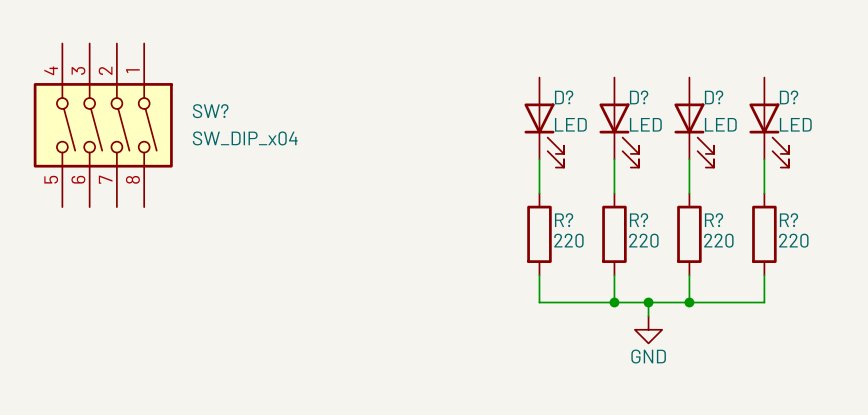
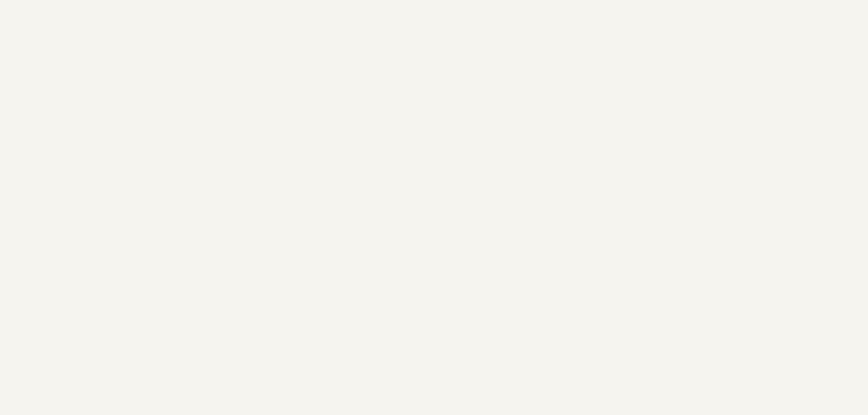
D?: LED (544, 122) -> none
D?: LED (619, 122) -> none
D?: LED (694, 122) -> none
D?: LED (769, 122) -> none
SW?: SW_DIP_x04 (103, 125) -> none
wire: (539, 159) (539, 193) -> none
wire: (614, 159) (614, 193) -> none
wire: (689, 159) (689, 193) -> none
wire: (764, 159) (764, 193) -> none
R?: 220 (539, 234) -> none
R?: 220 (614, 234) -> none
R?: 220 (689, 234) -> none
R?: 220 (764, 234) -> none
wire: (539, 275) (539, 302) (764, 302) (764, 275) -> none
wire: (614, 275) (614, 302) -> none
wire: (689, 275) (689, 302) -> none
junction: (614, 302) -> none
wire: (648, 302) (648, 316) -> none
junction: (648, 302) -> none
junction: (689, 302) -> none
power symbol: GND (648, 329) -> none

